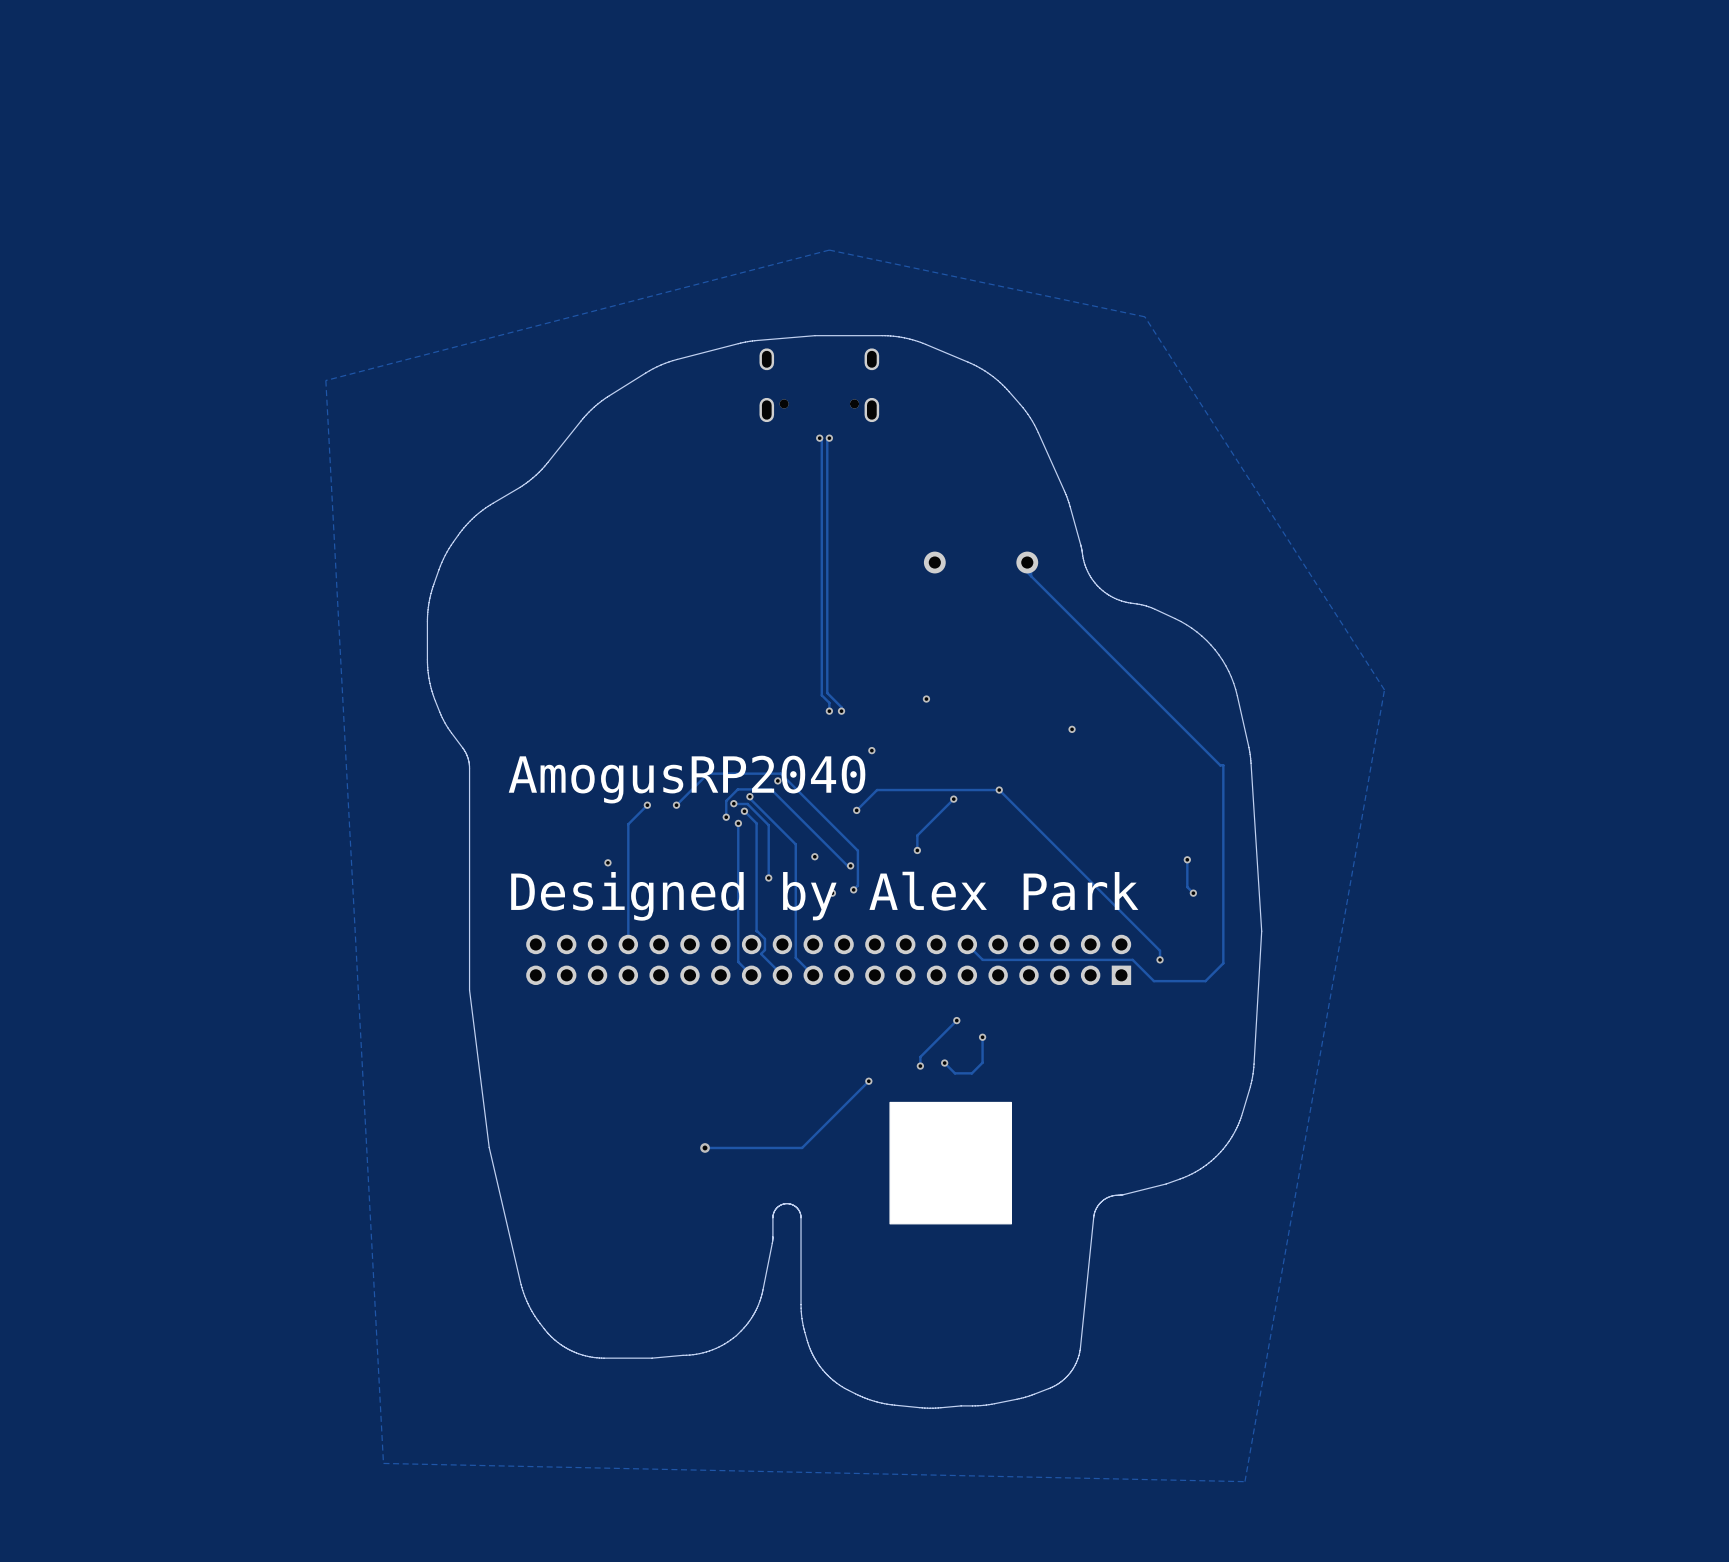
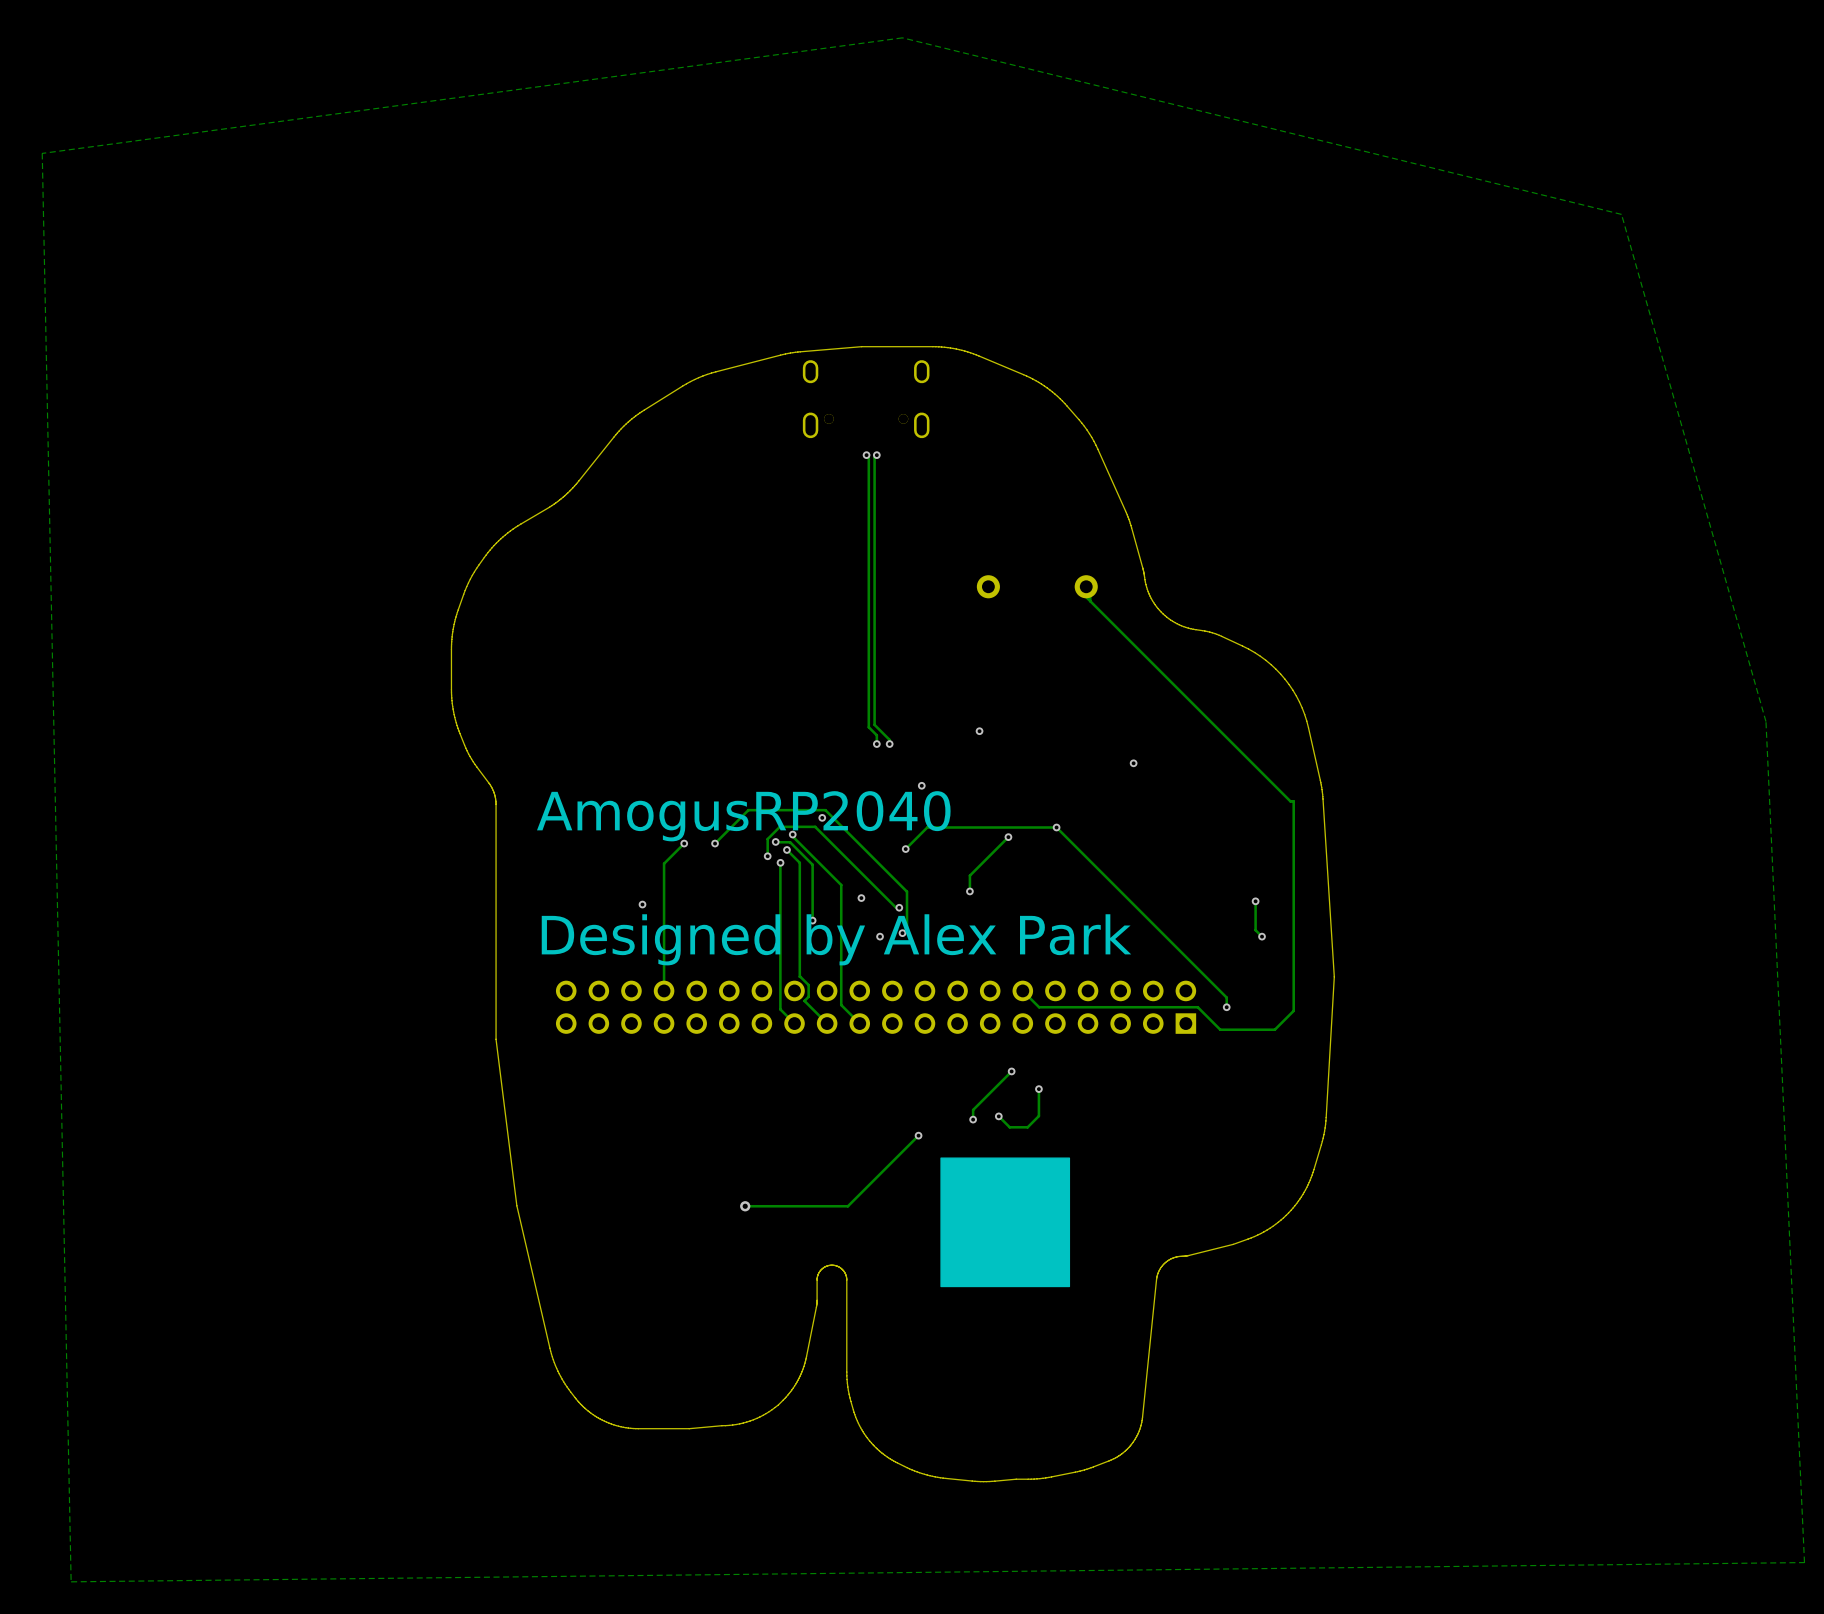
zone outline: (829, 250) (1144, 316) (1384, 689) (1244, 1481) (383, 1463) (325, 380) (829, 250) -> (902, 37) (1621, 214) (1765, 721) (1804, 1562) (71, 1581) (42, 153) (902, 37)

